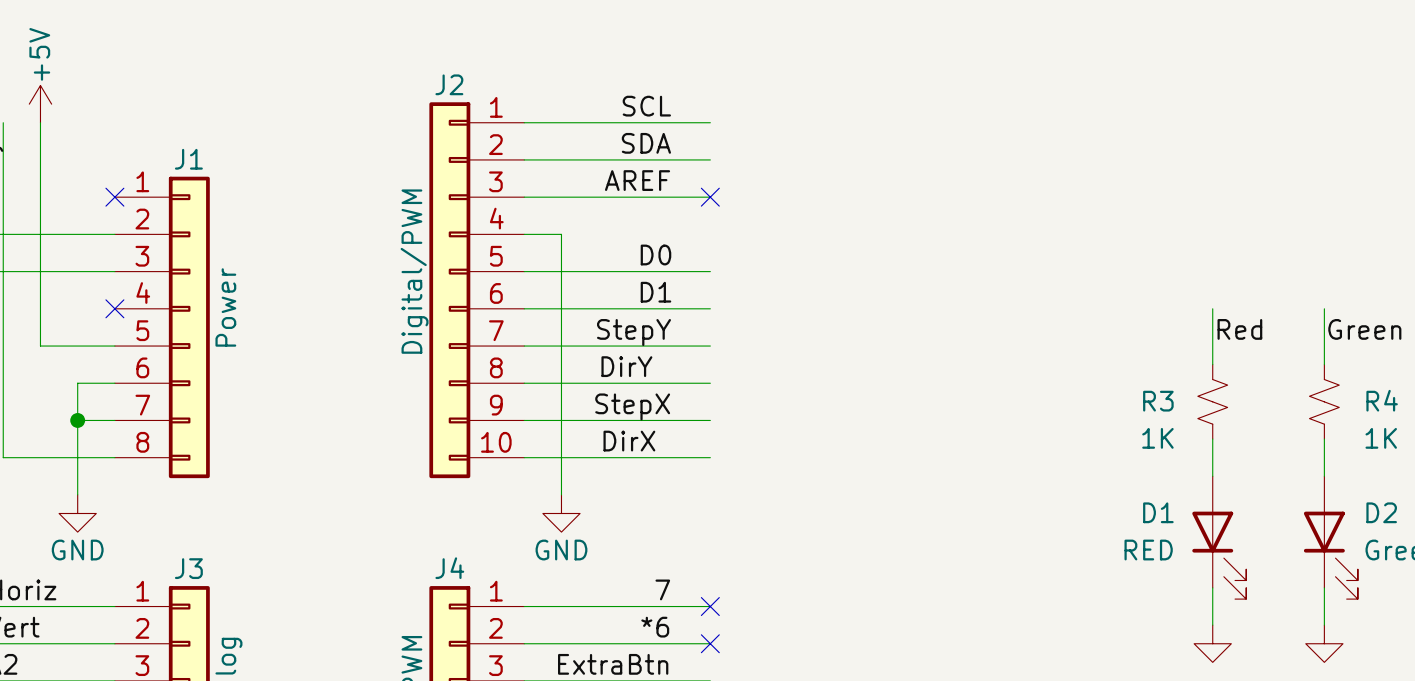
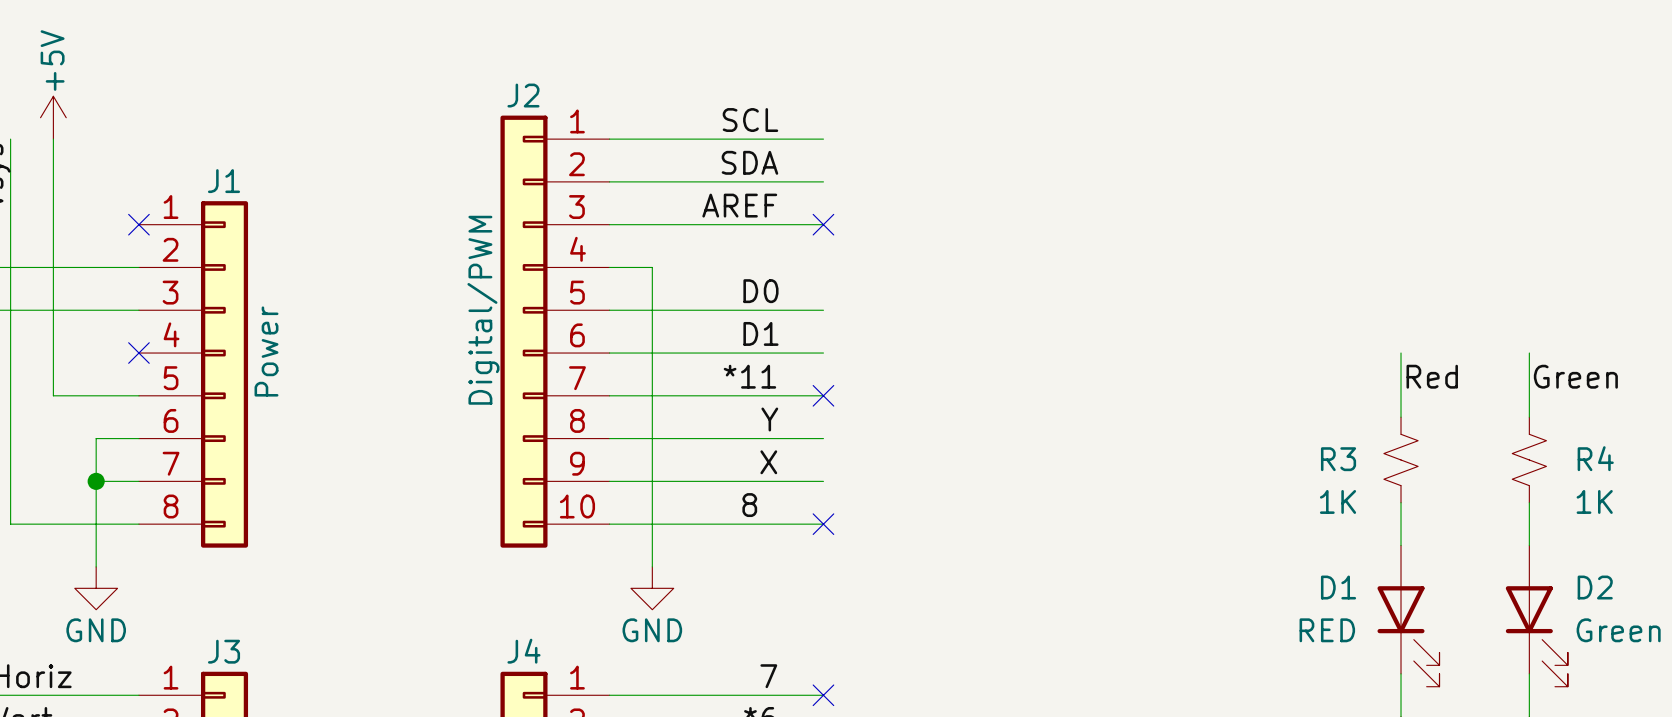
label: StepY (633, 332) -> *11 (749, 376)
no-connect mark: none -> (823, 395)
label: DirY (626, 366) -> none
label: none -> Y (769, 419)
label: StepX (632, 406) -> X (768, 462)
label: DirX (629, 441) -> none
label: none -> 8 (749, 505)
no-connect mark: none -> (823, 524)

